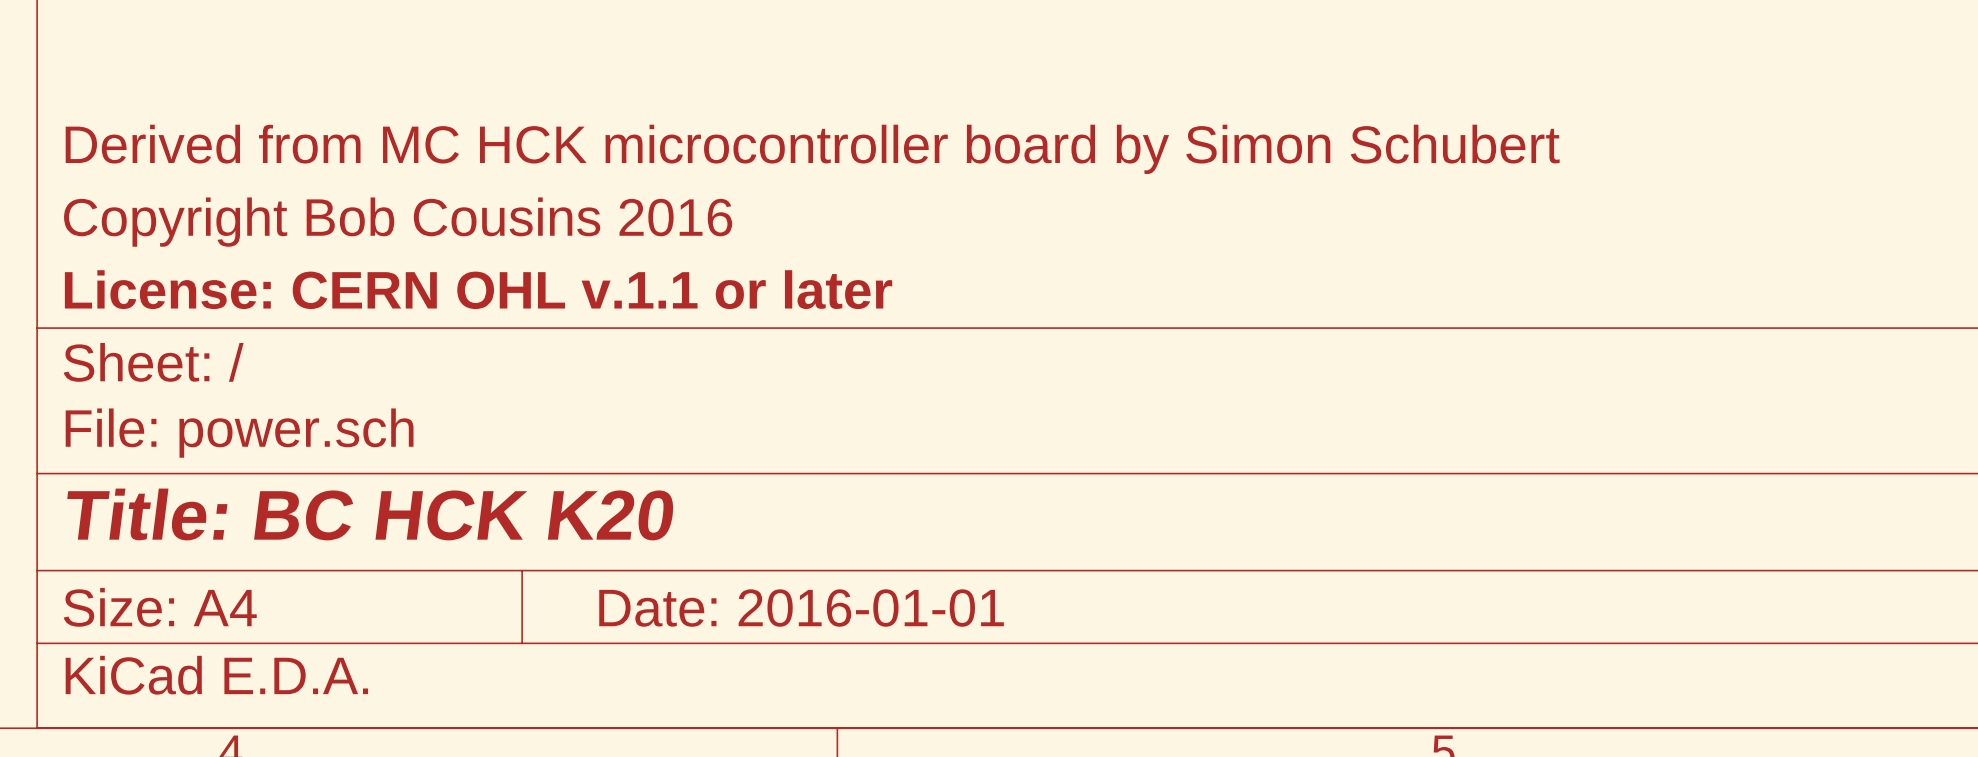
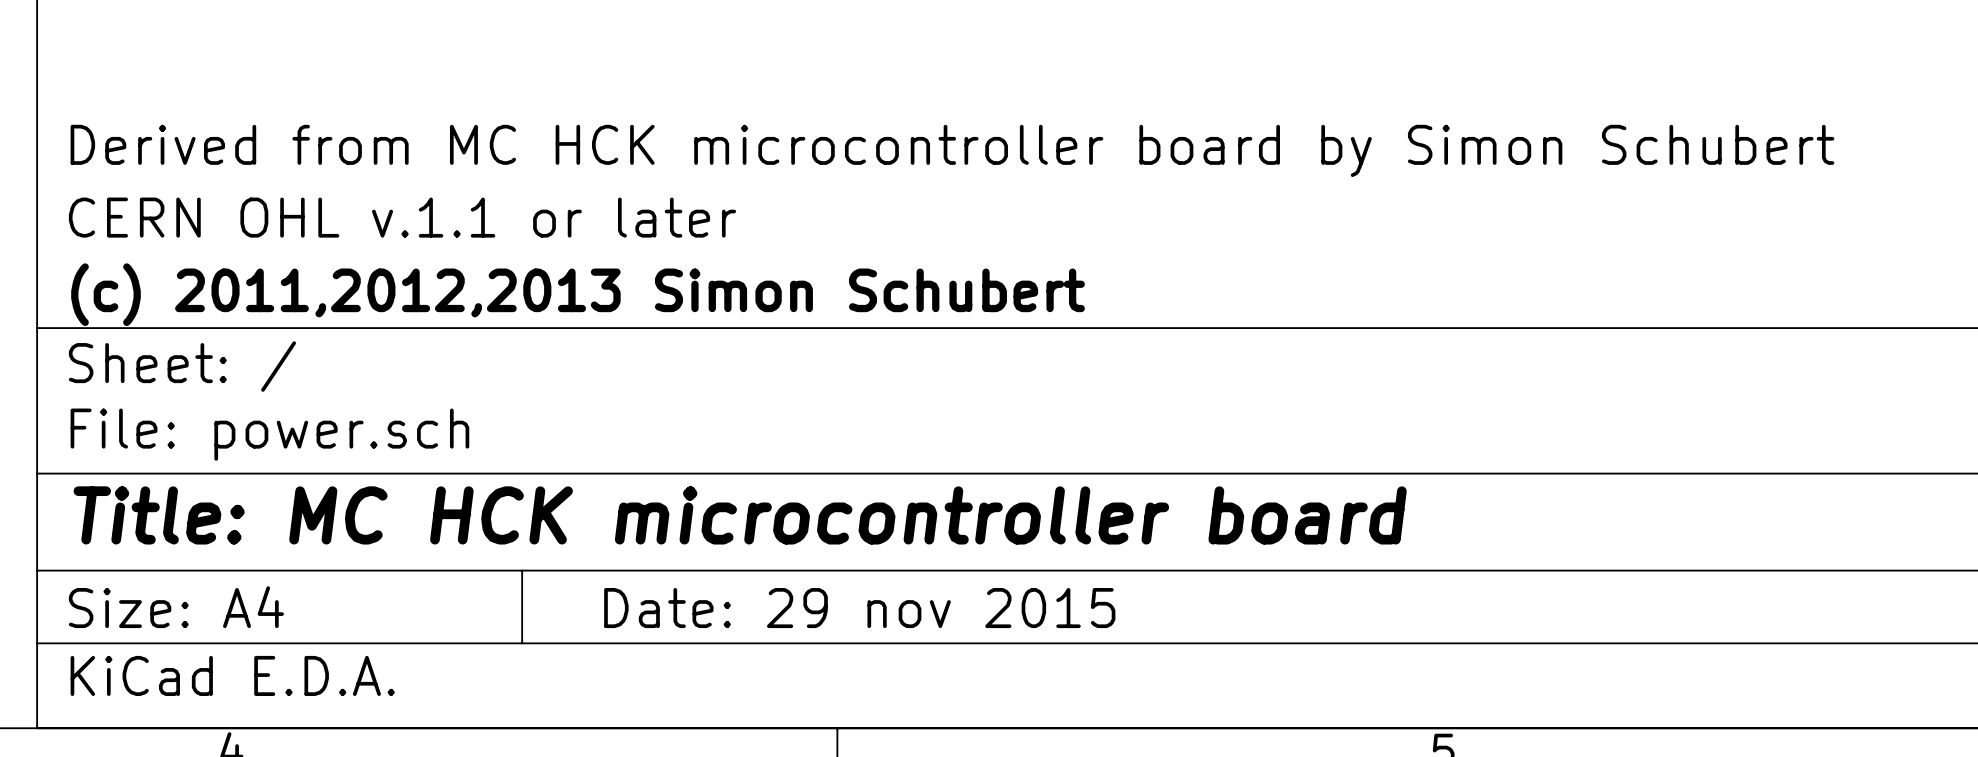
title block: Copyright Bob Cousins 2016 (398, 222) -> CERN OHL v.1.1 or later (402, 217)
title block: License: CERN OHL v.1.1 or later (478, 289) -> (c) 2011,2012,2013 Simon Schubert (578, 294)
title block: Title: BC HCK K20 (370, 514) -> Title: MC HCK microcontroller board (740, 515)
title block: Date: 2016-01-01 (801, 608) -> Date: 29 nov 2015 (859, 608)

